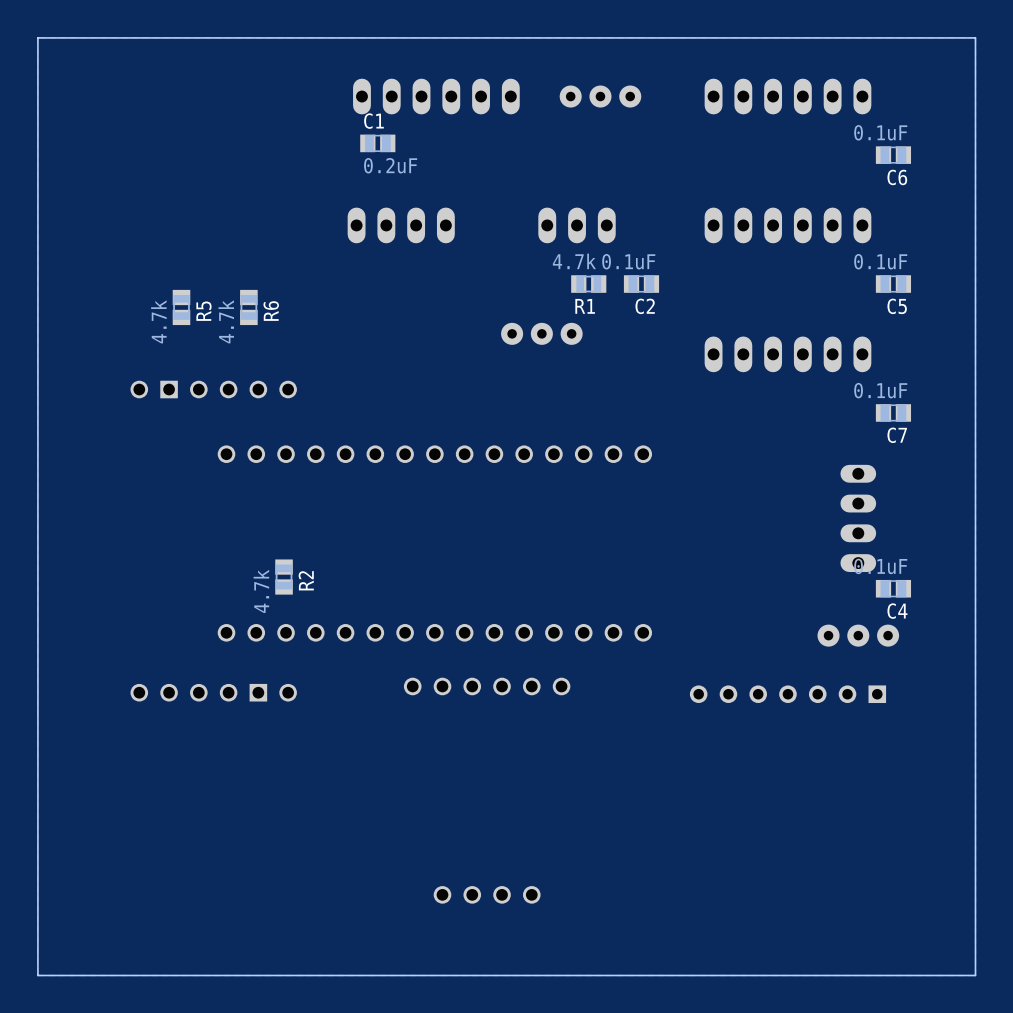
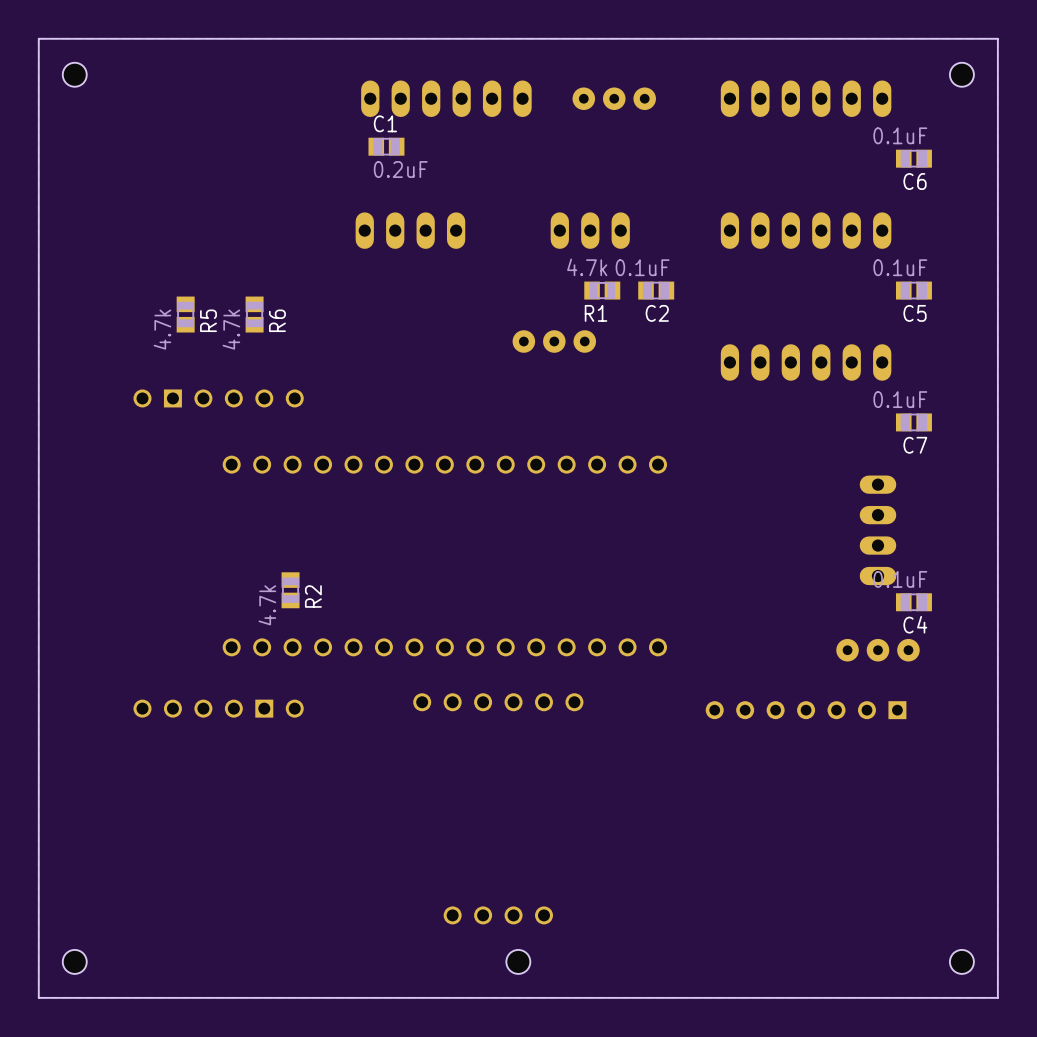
hole: none -> (74, 74)
hole: none -> (961, 74)
hole: none -> (74, 961)
hole: none -> (518, 961)
hole: none -> (961, 961)

